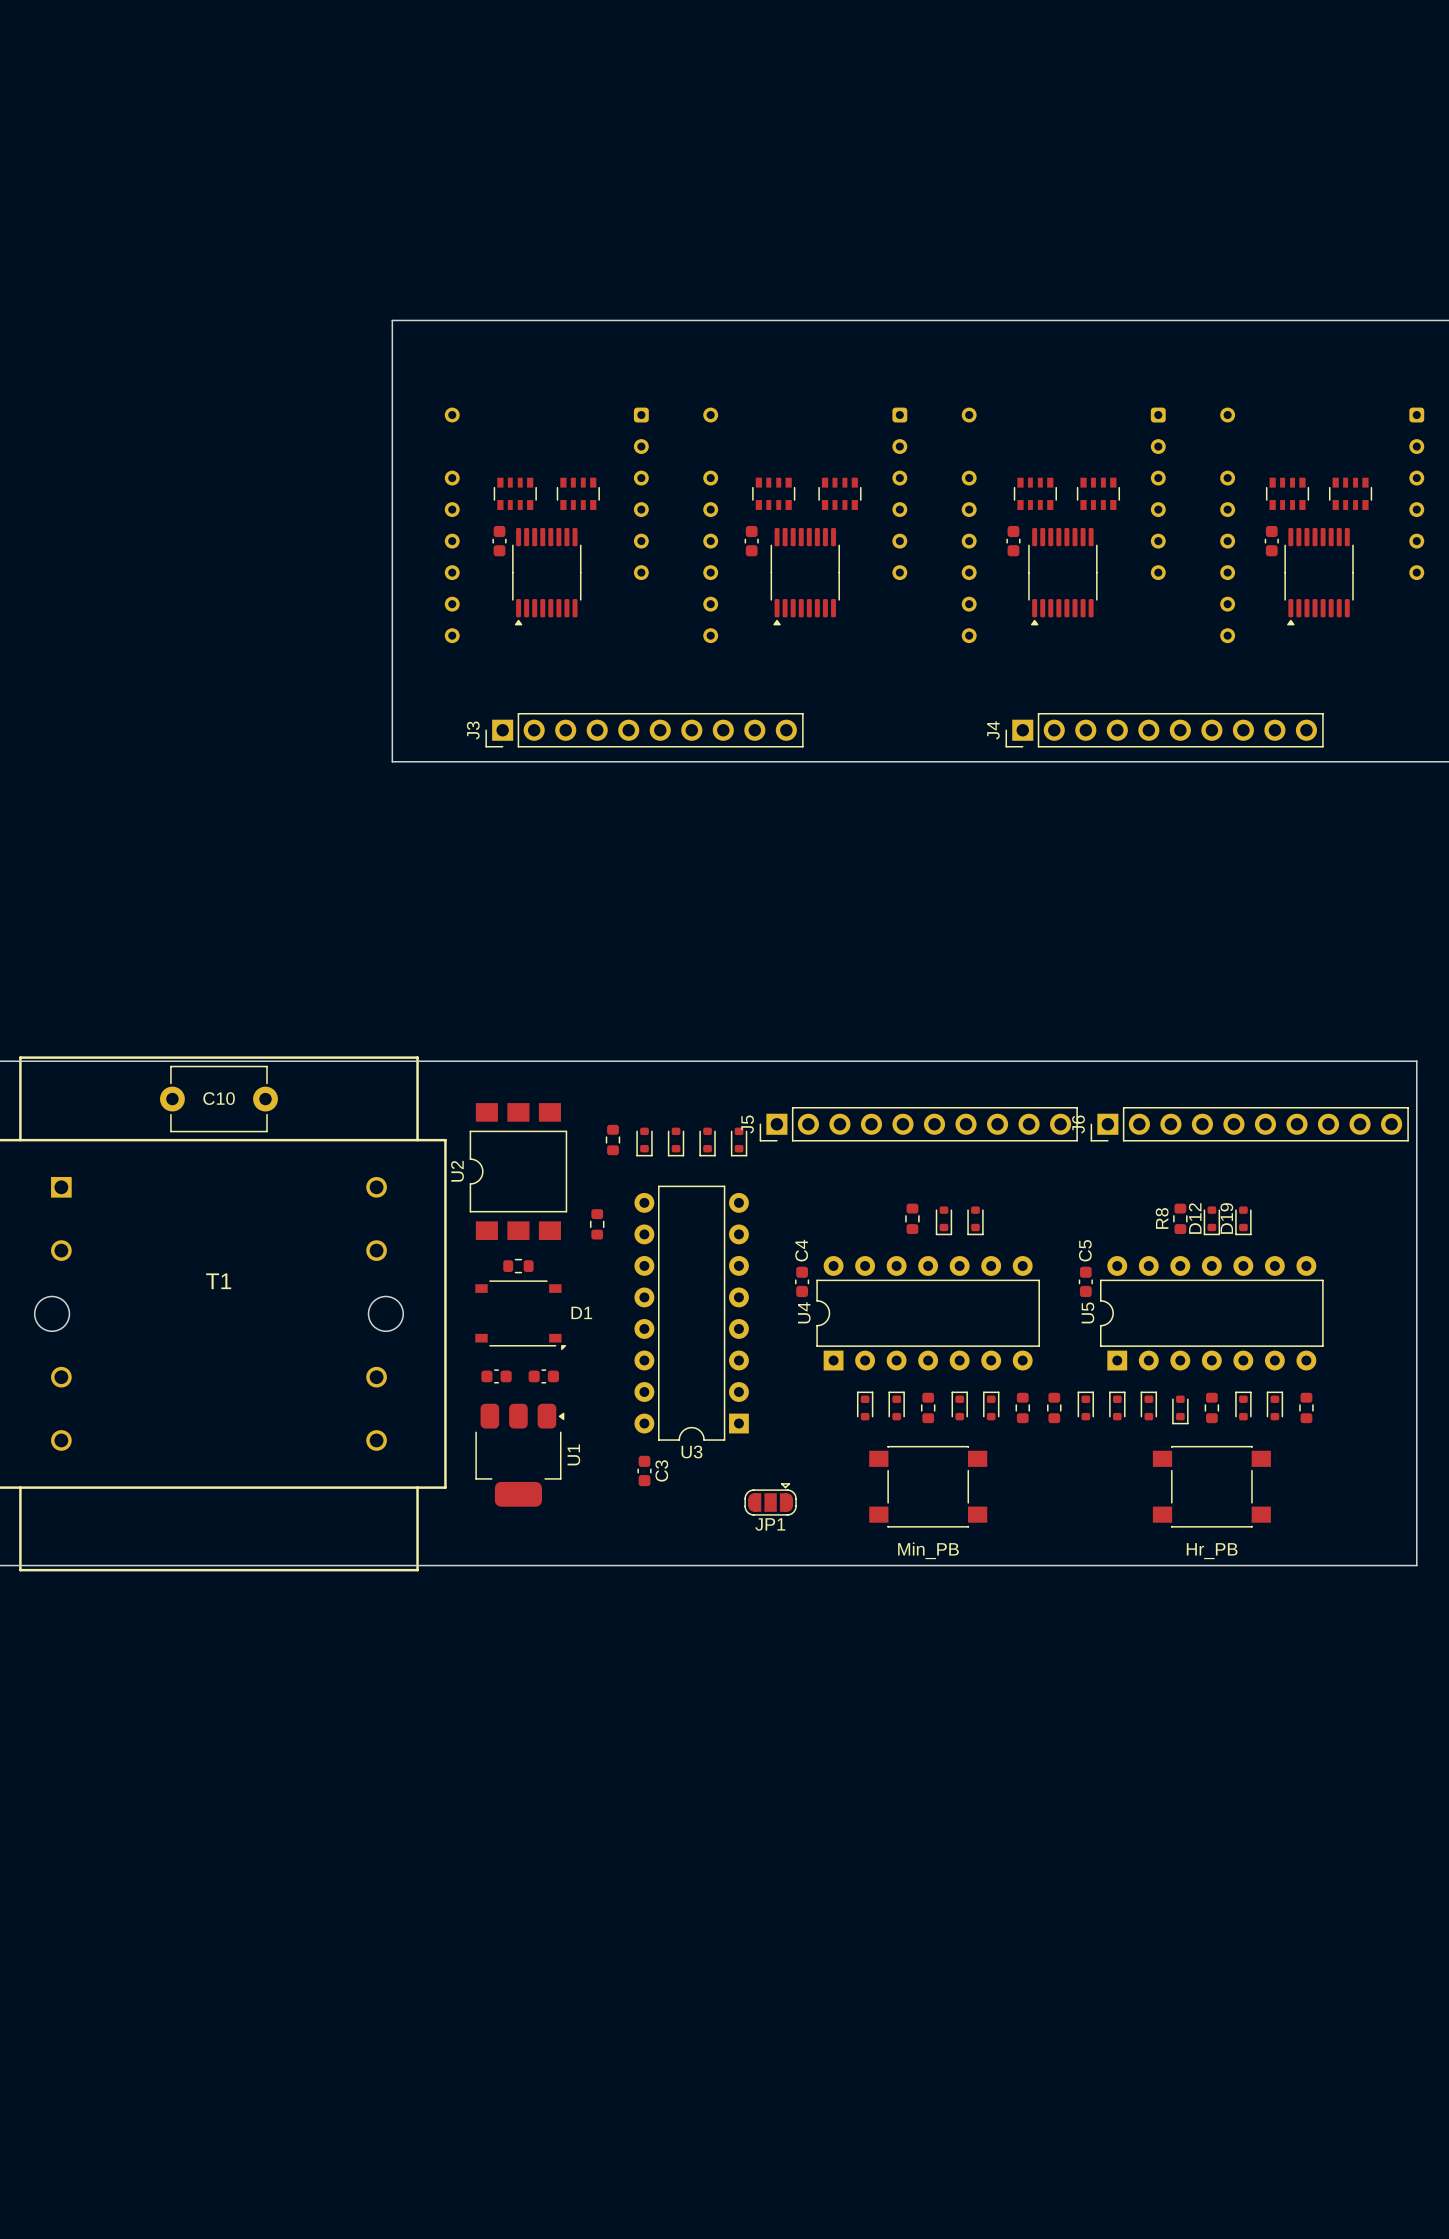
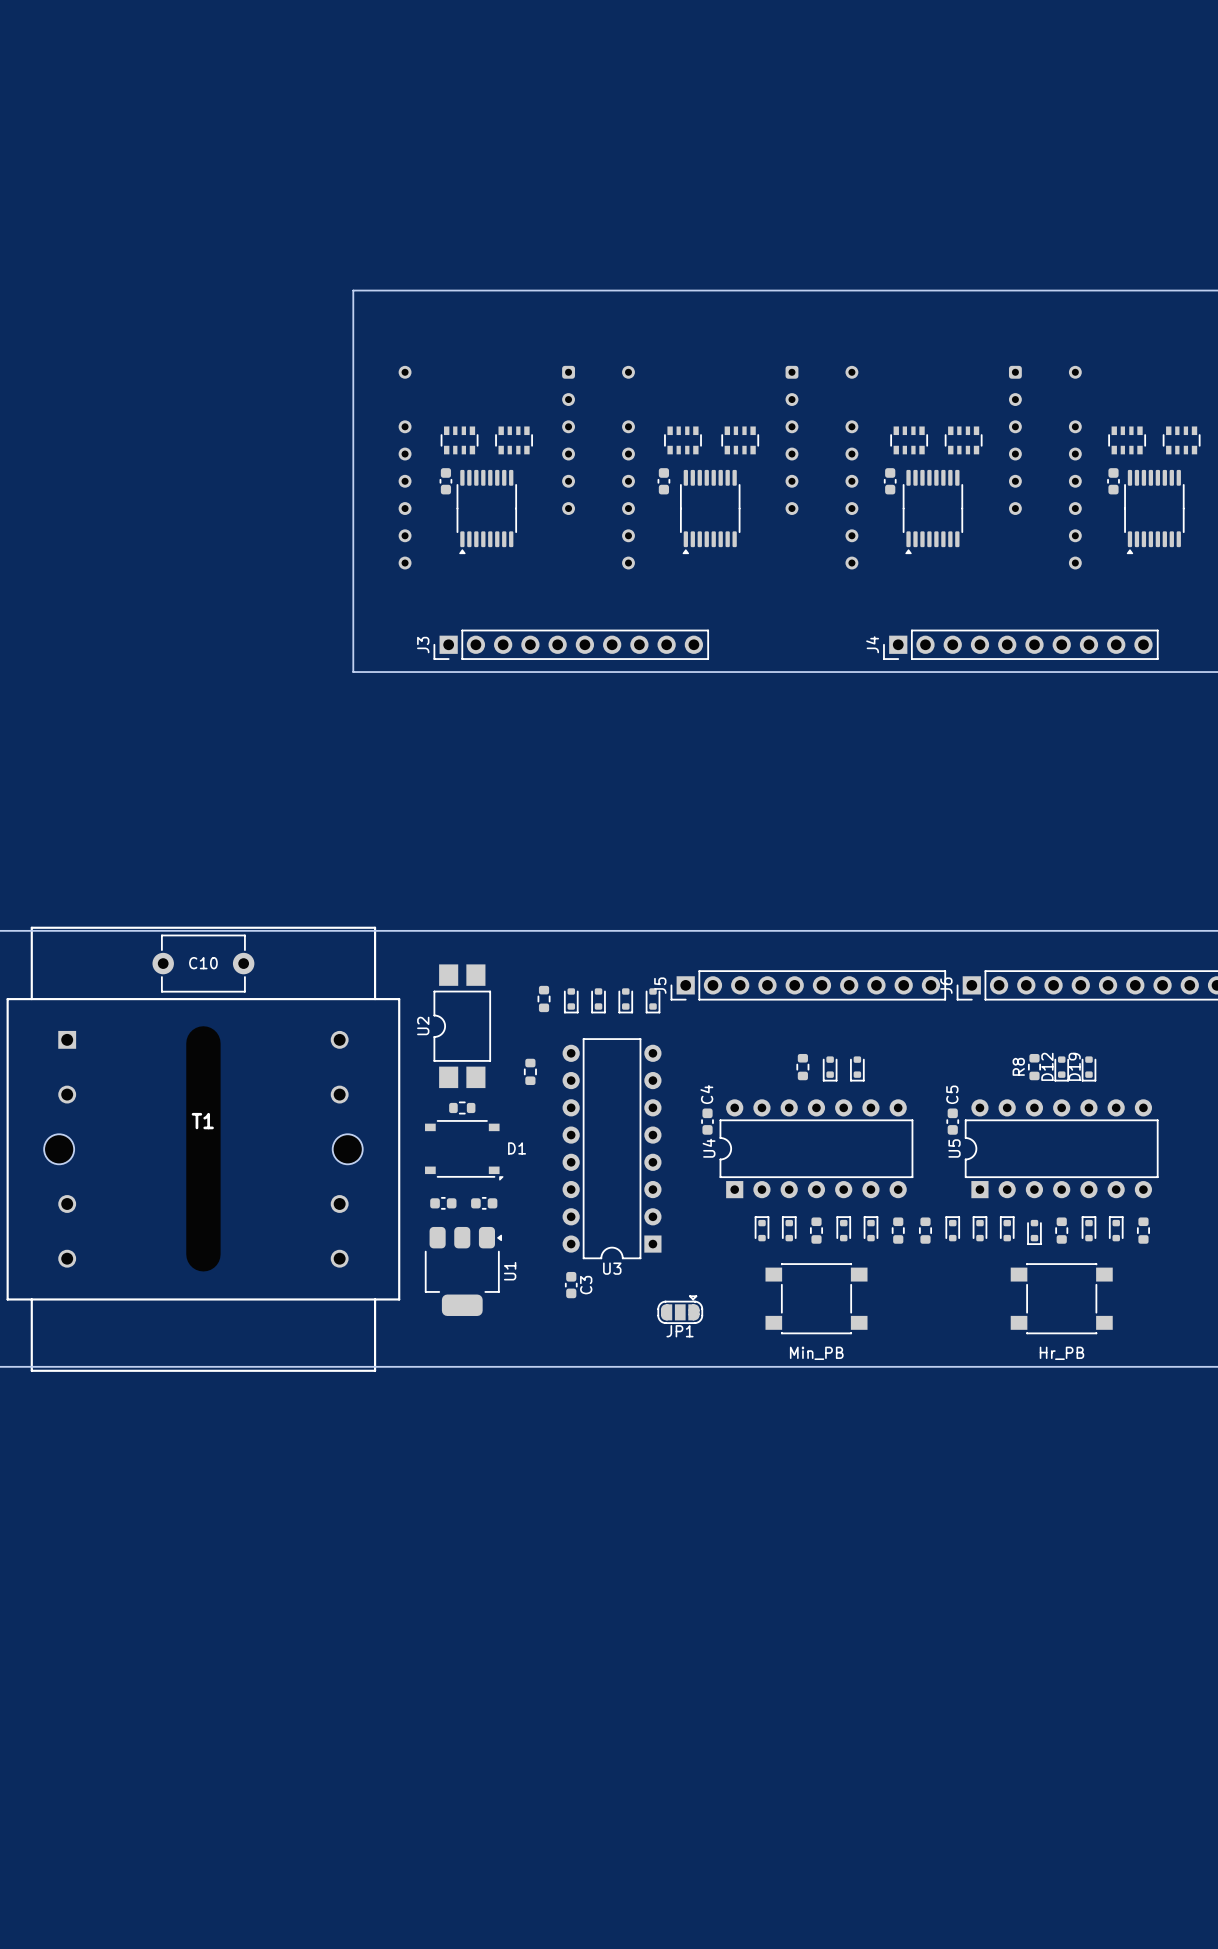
U2 footprint: [469, 1103, 568, 1240] -> [433, 964, 491, 1089]

